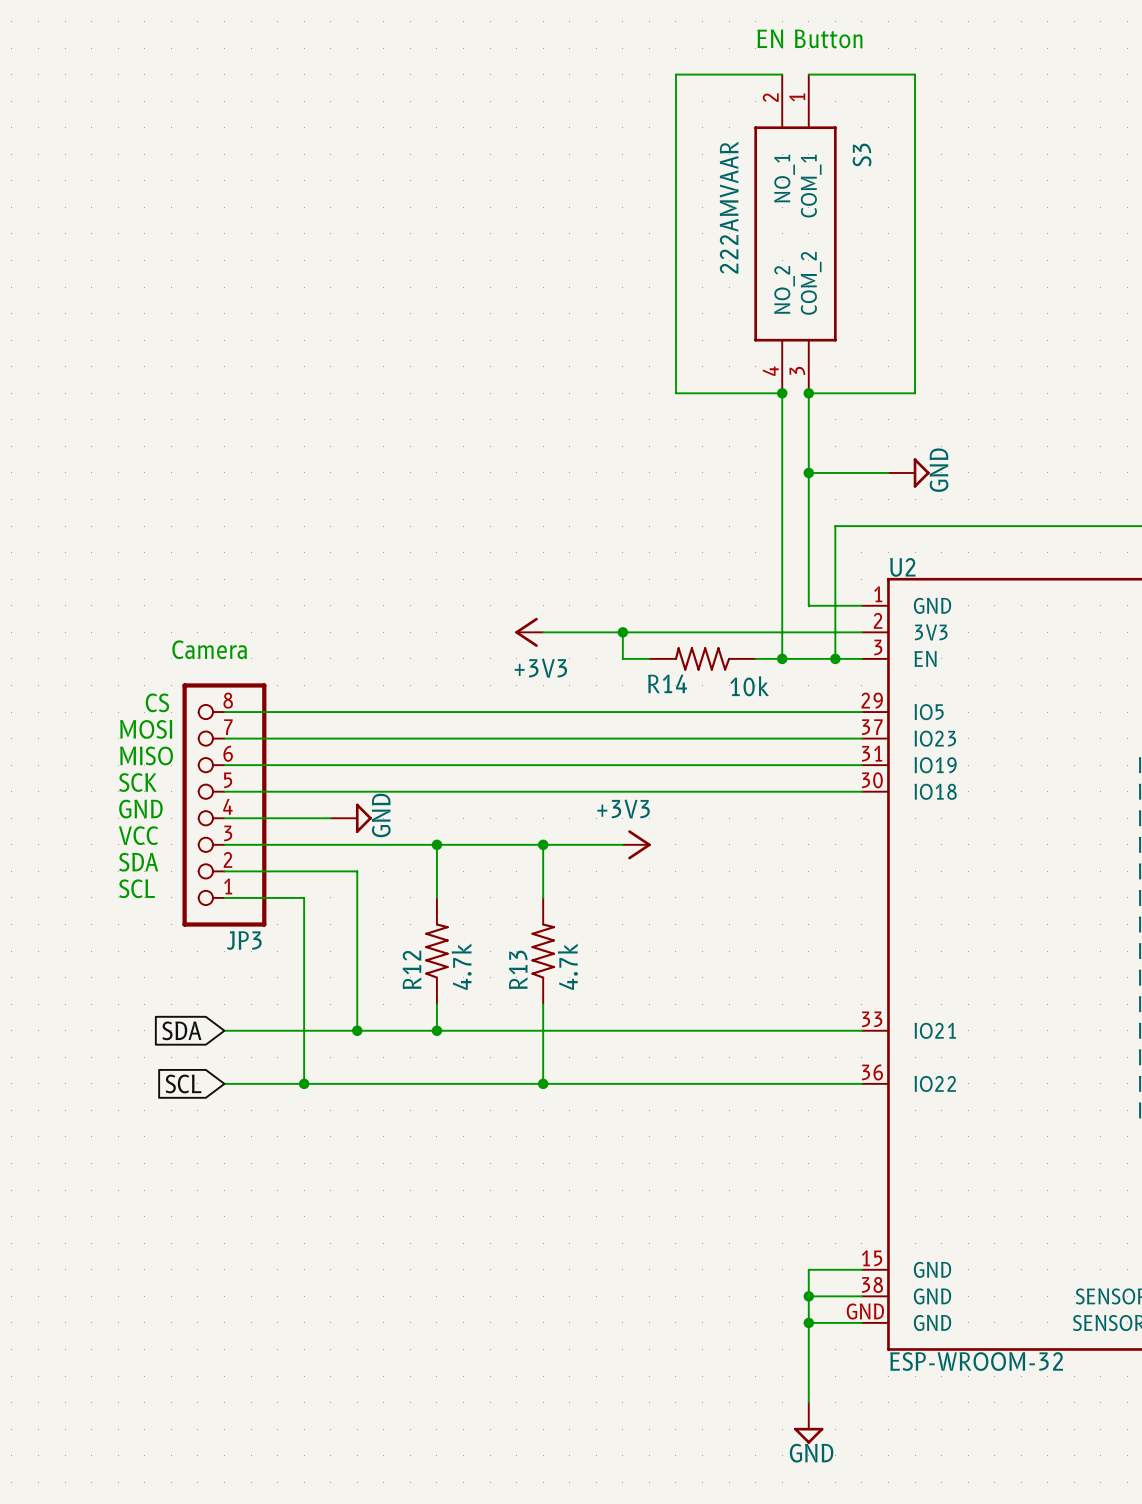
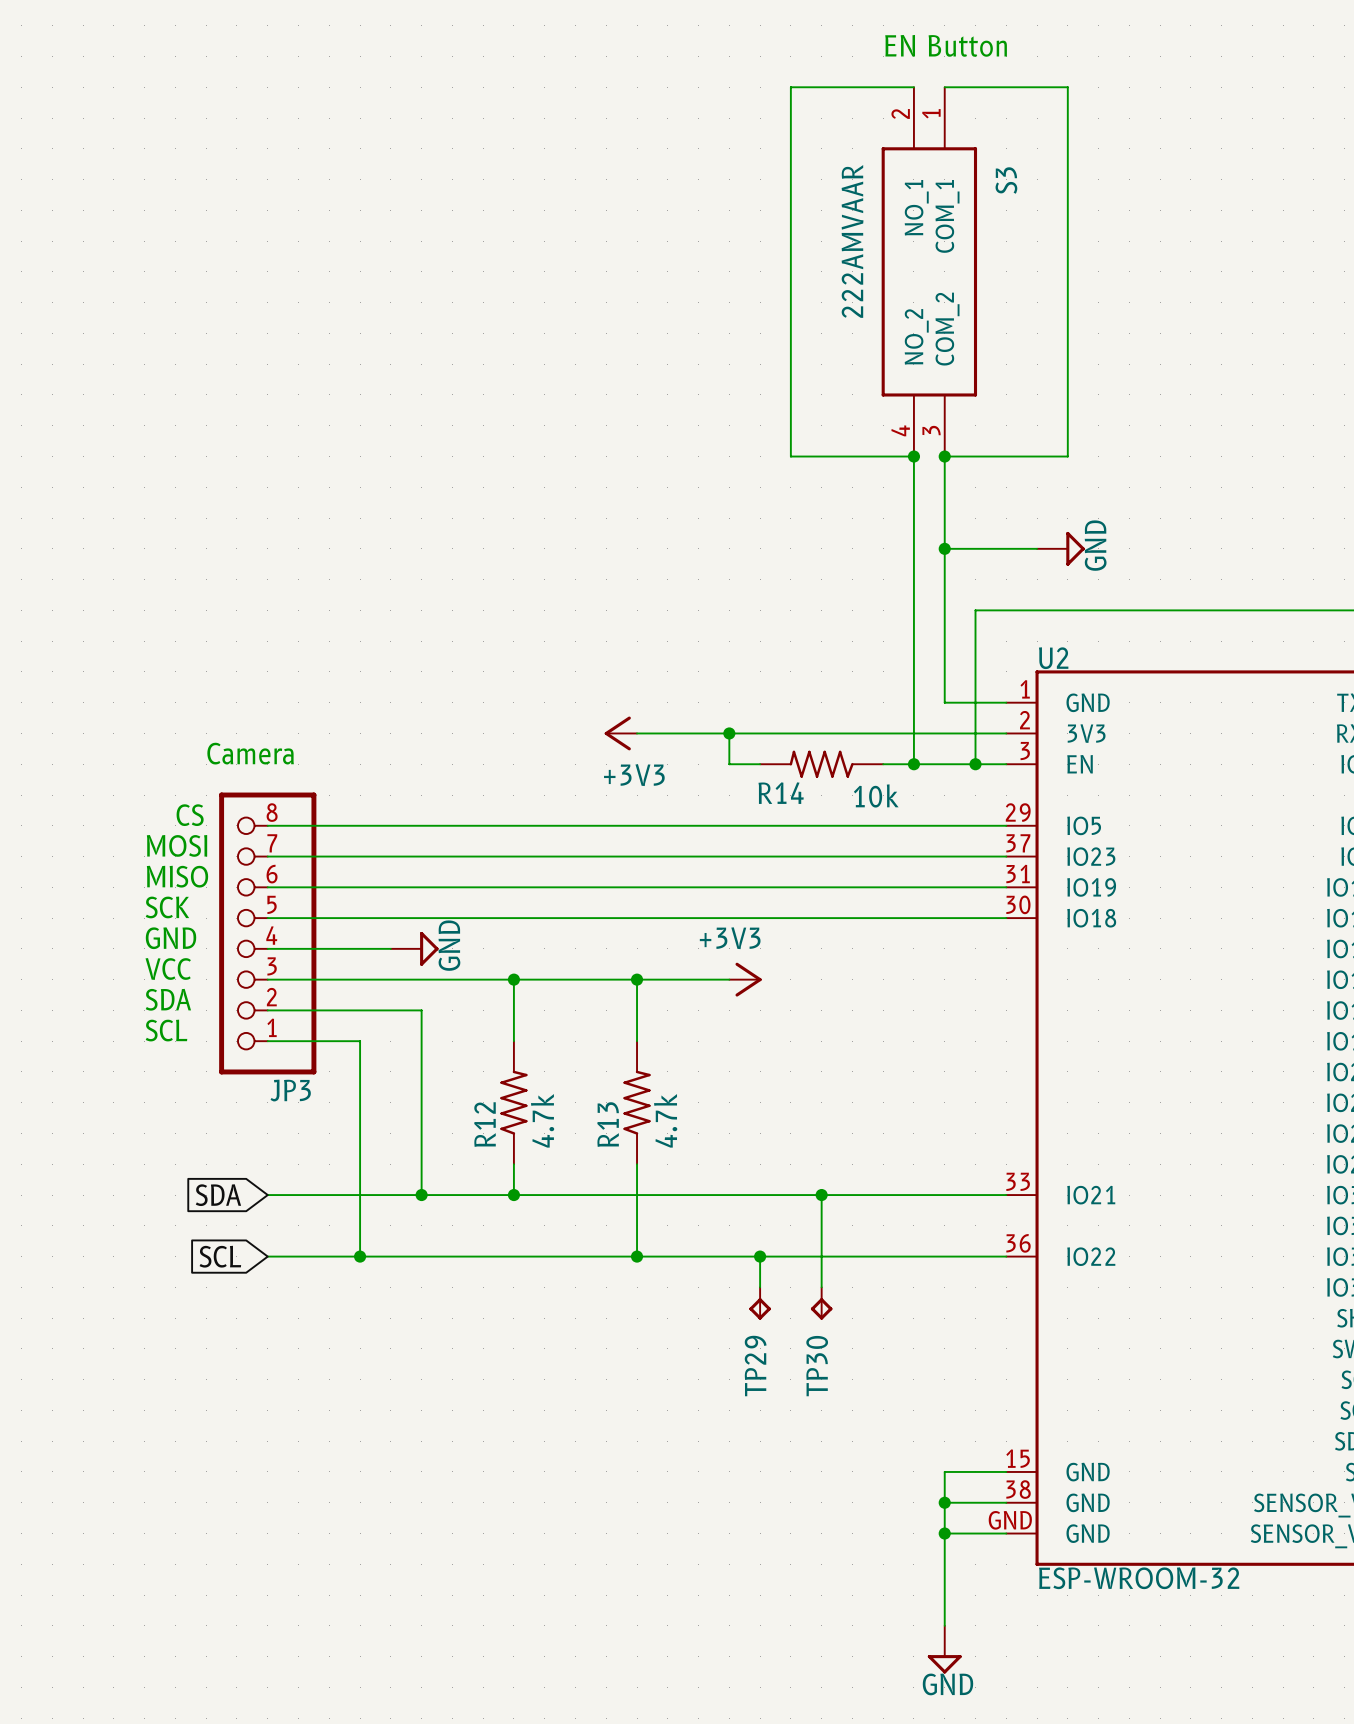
wire: none -> (821, 1195) (821, 1287)
junction: none -> (821, 1195)
wire: none -> (760, 1256) (760, 1287)
junction: none -> (760, 1256)
TP29: none -> (760, 1303)
TP30: none -> (821, 1303)

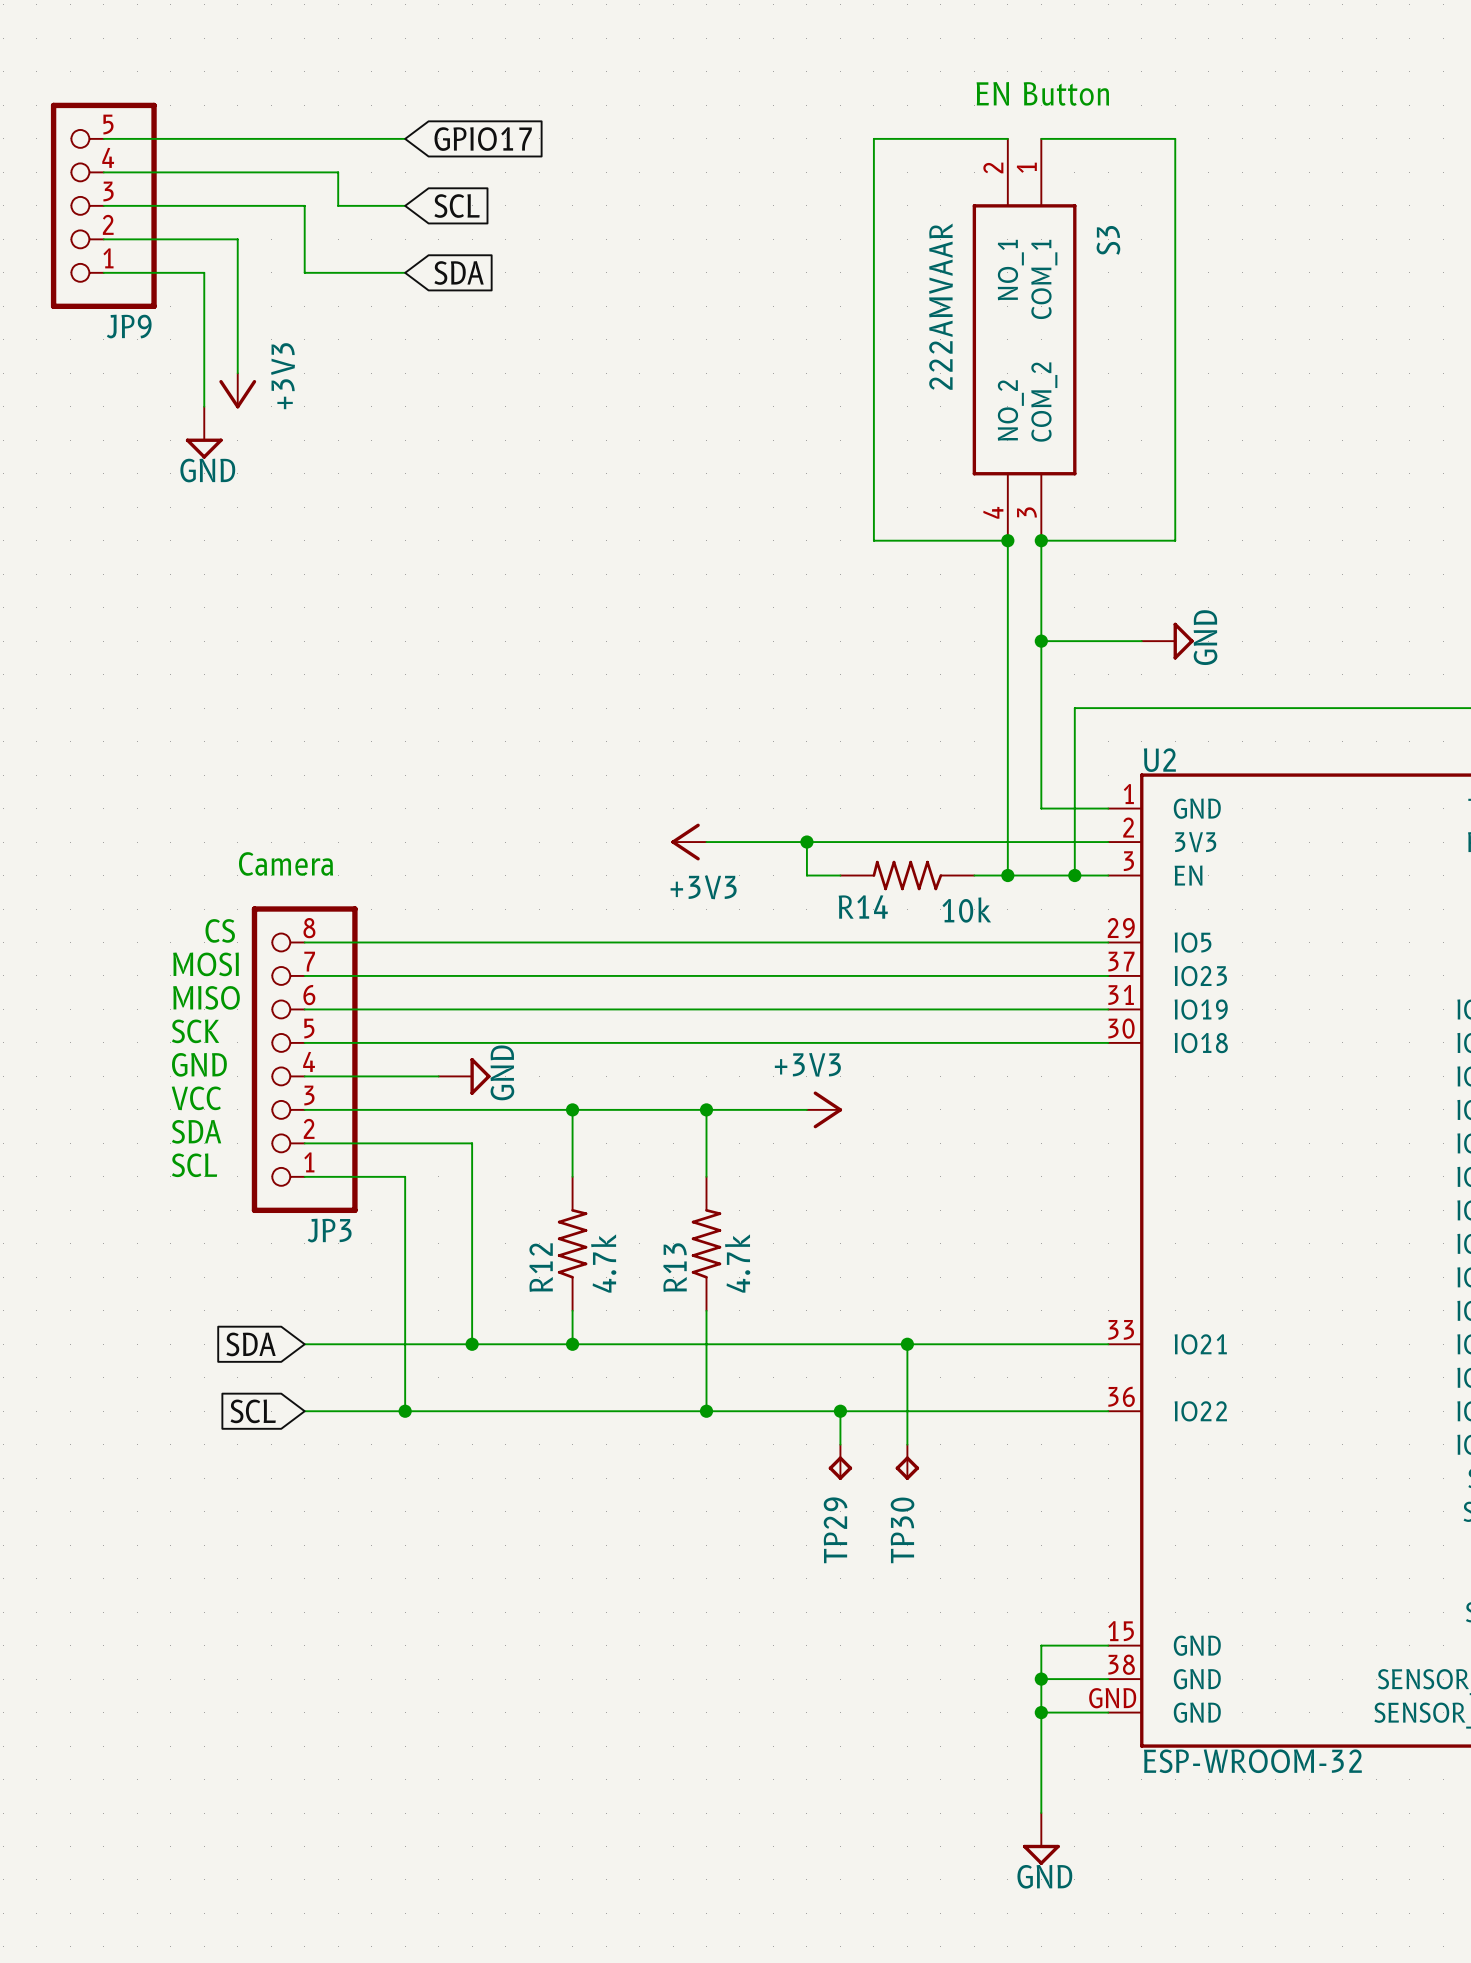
wire: none -> (103, 138) (405, 138)
global label: none -> GPIO17 (483, 139)
wire: none -> (103, 172) (338, 172) (338, 205) (405, 205)
wire: none -> (103, 205) (304, 205) (304, 272) (405, 272)
JP9: none -> (103, 205)
global label: none -> SCL (457, 206)
wire: none -> (103, 239) (237, 239) (237, 373)
wire: none -> (103, 272) (204, 272) (204, 406)
global label: none -> SDA (459, 272)
power symbol: none -> +3V3 (237, 390)
power symbol: none -> GND (204, 432)

